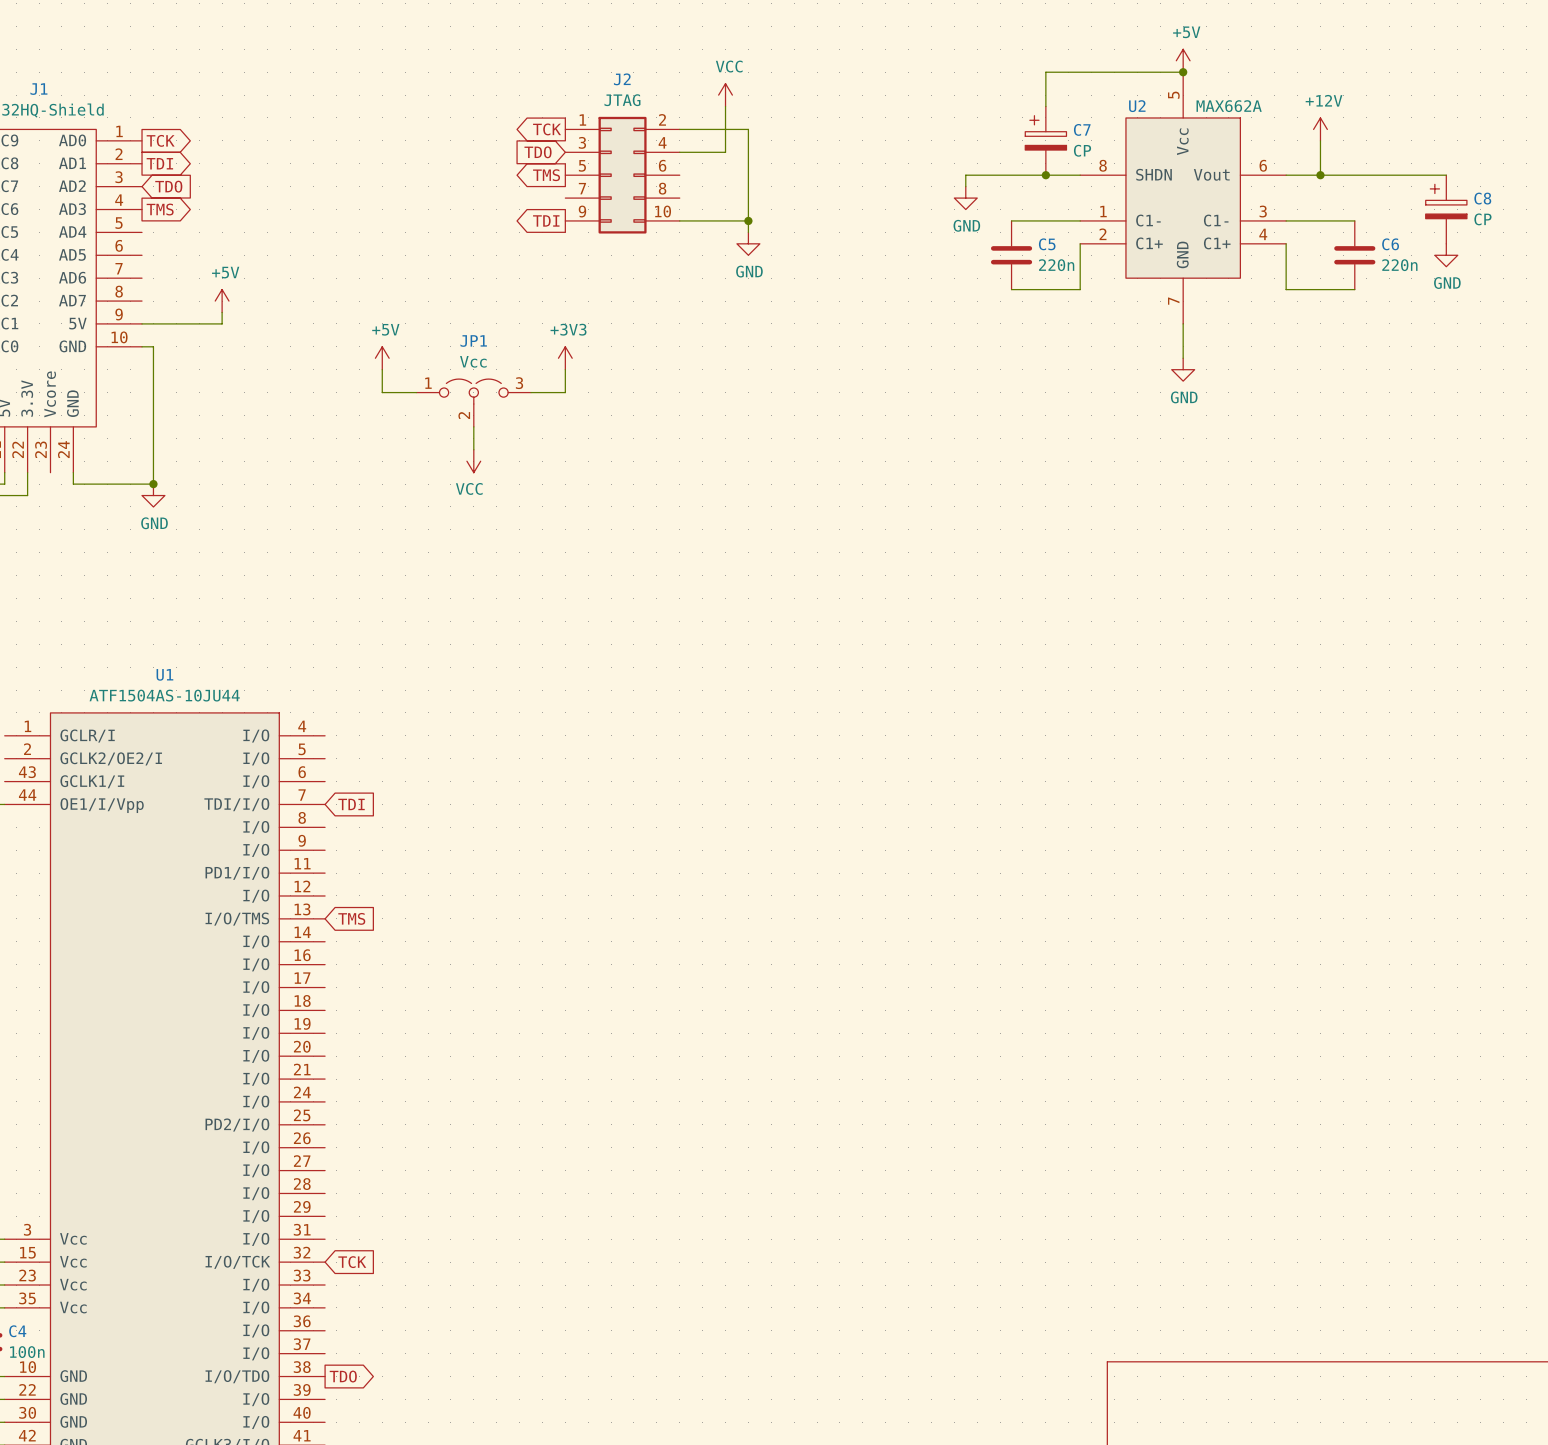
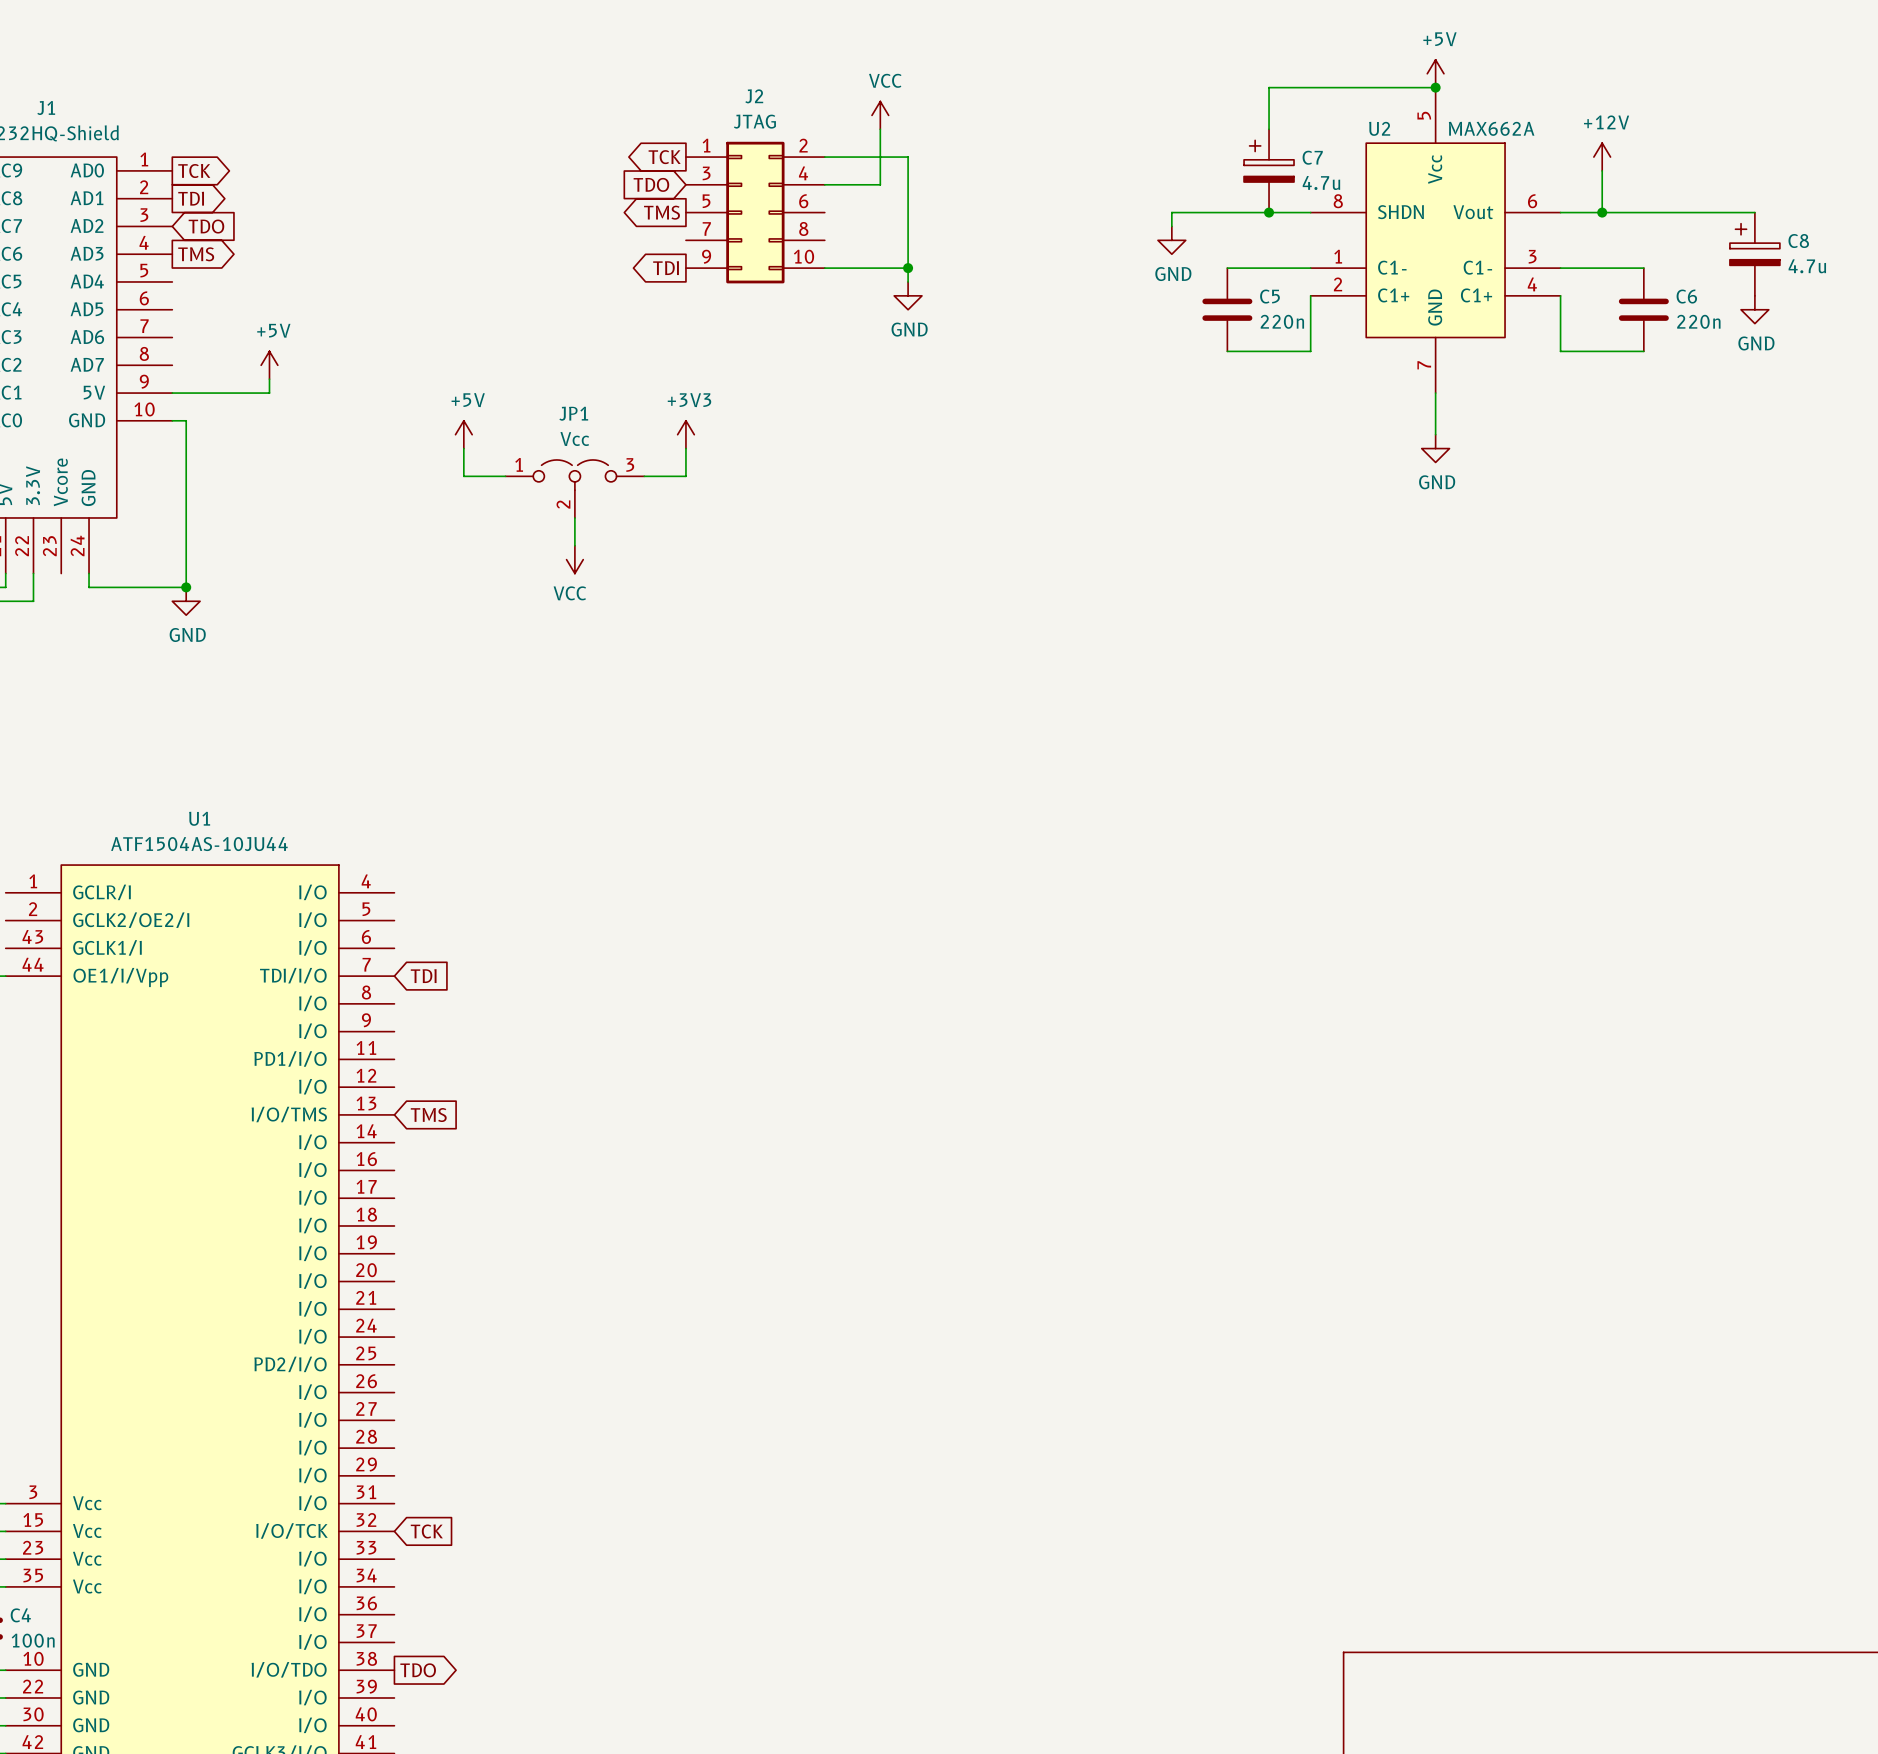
C7 value: CP (1082, 150) -> 4.7u (1321, 182)
C8 value: CP (1482, 219) -> 4.7u (1807, 266)

